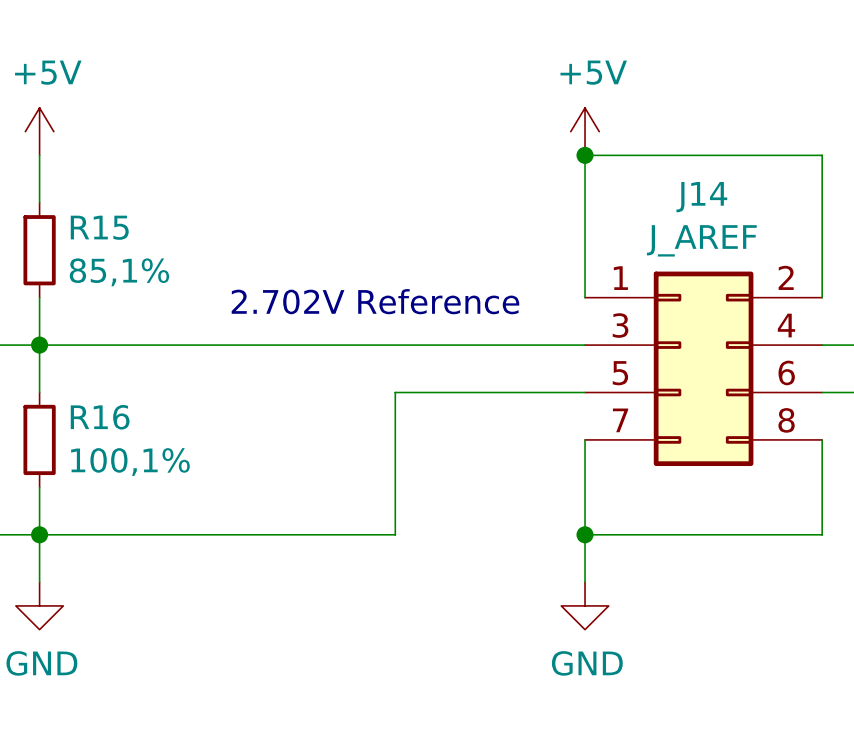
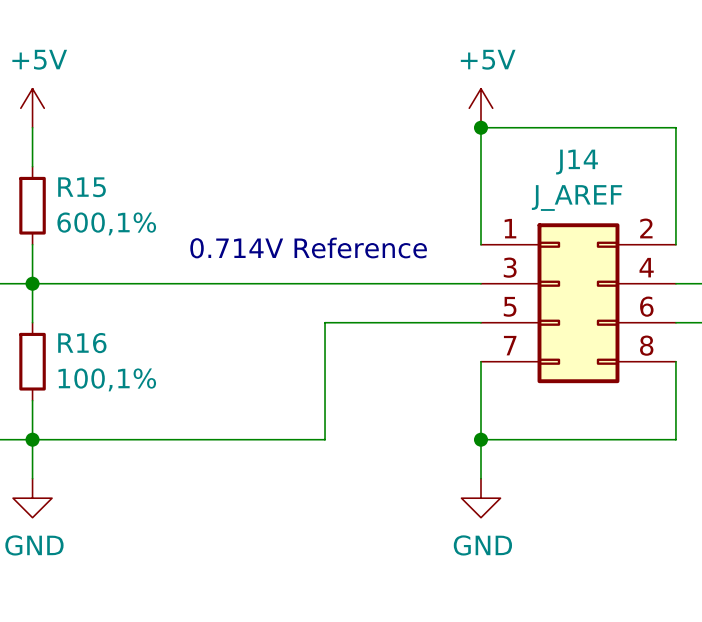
R15 value: 85,1% (119, 272) -> 600,1% (106, 223)
text: 2.702V Reference (375, 301) -> 0.714V Reference (308, 248)

